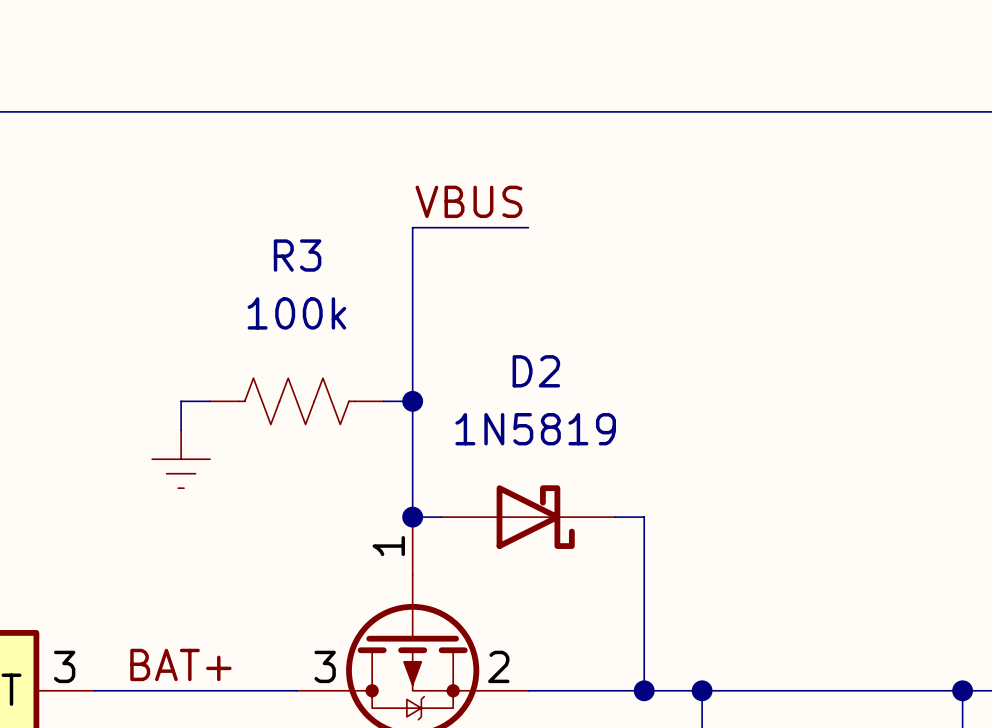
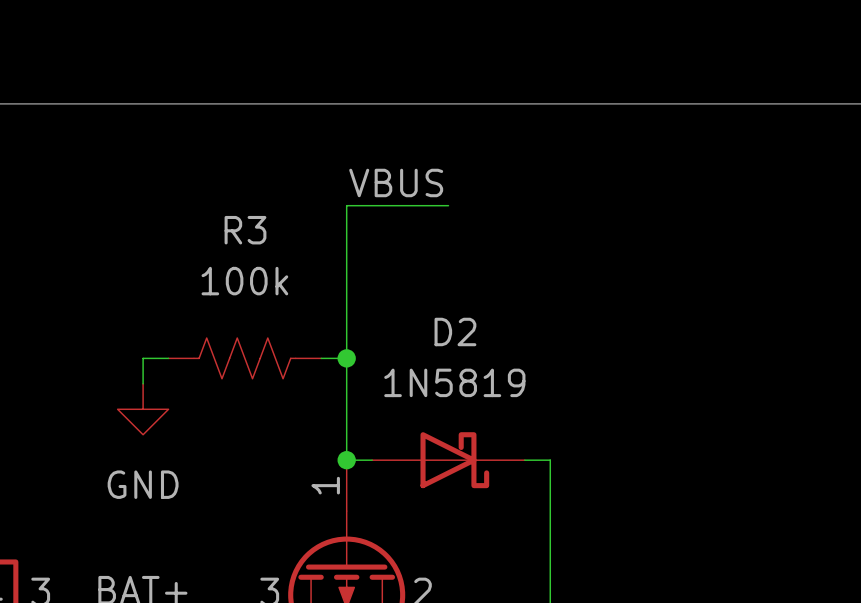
power symbol shape: [152, 430, 211, 489] -> [117, 383, 169, 435]
power symbol text: none -> GND (143, 484)

